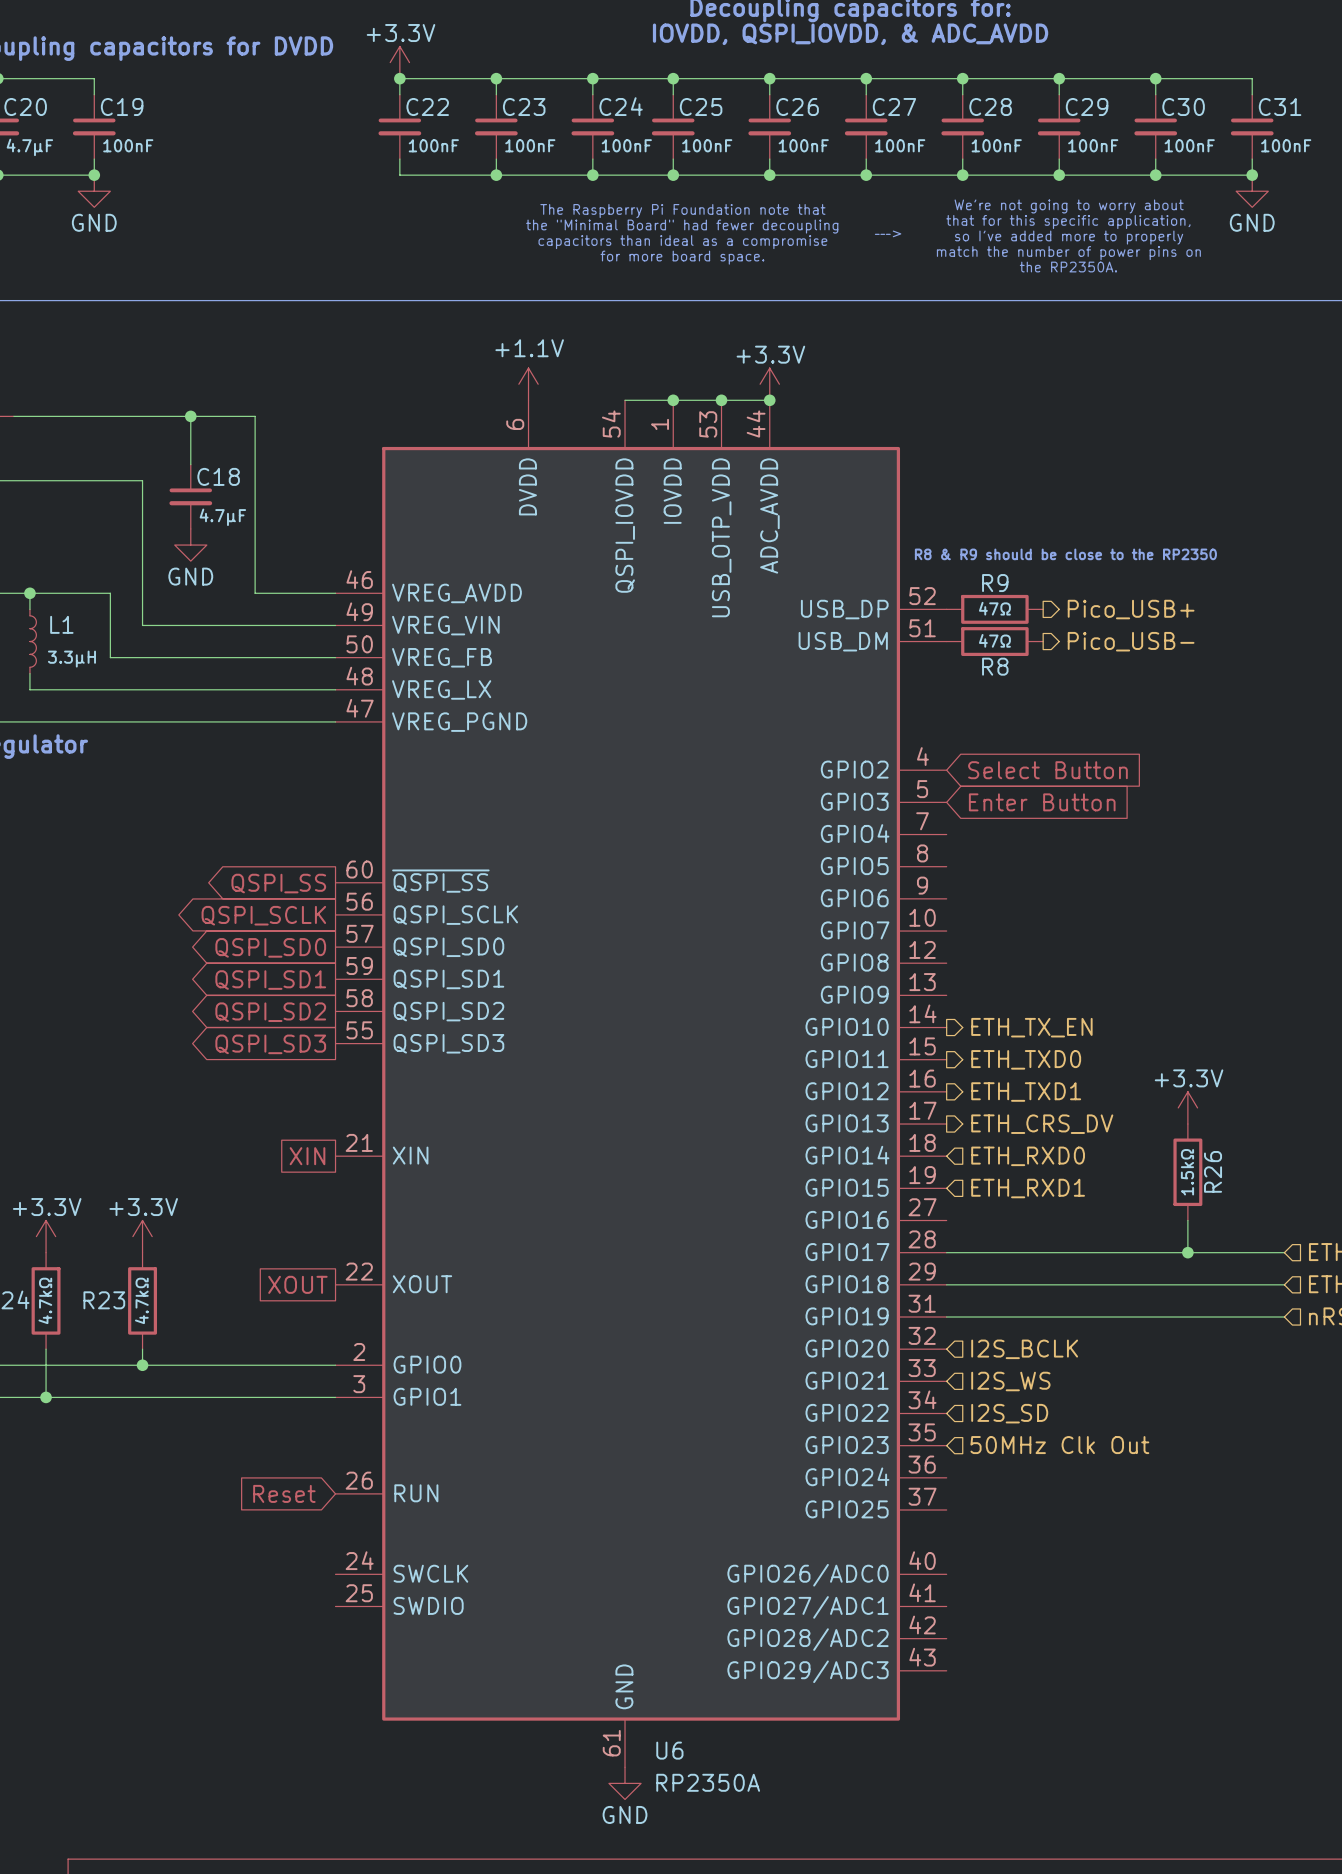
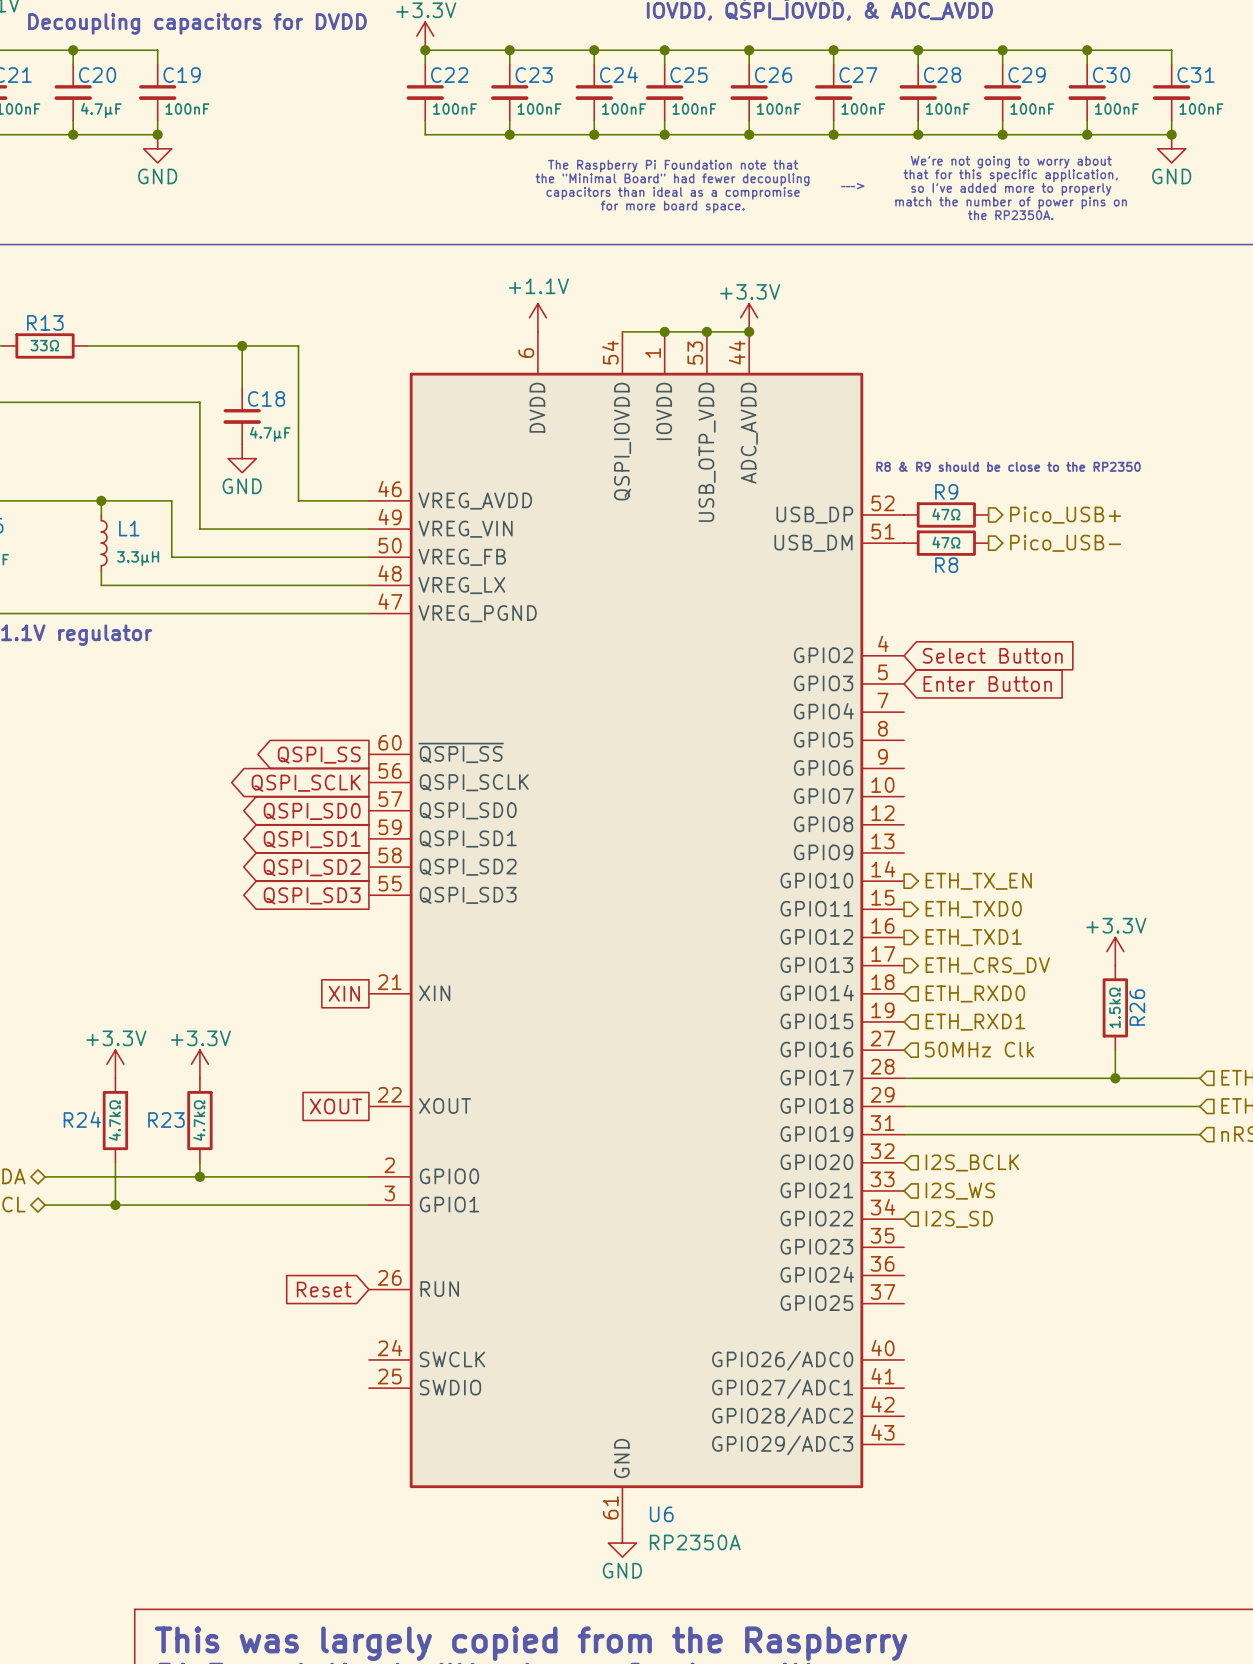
hierarchical label: none -> 50MHz Clk (979, 1049)
hierarchical label: 50MHz Clk Out (1059, 1445) -> none

